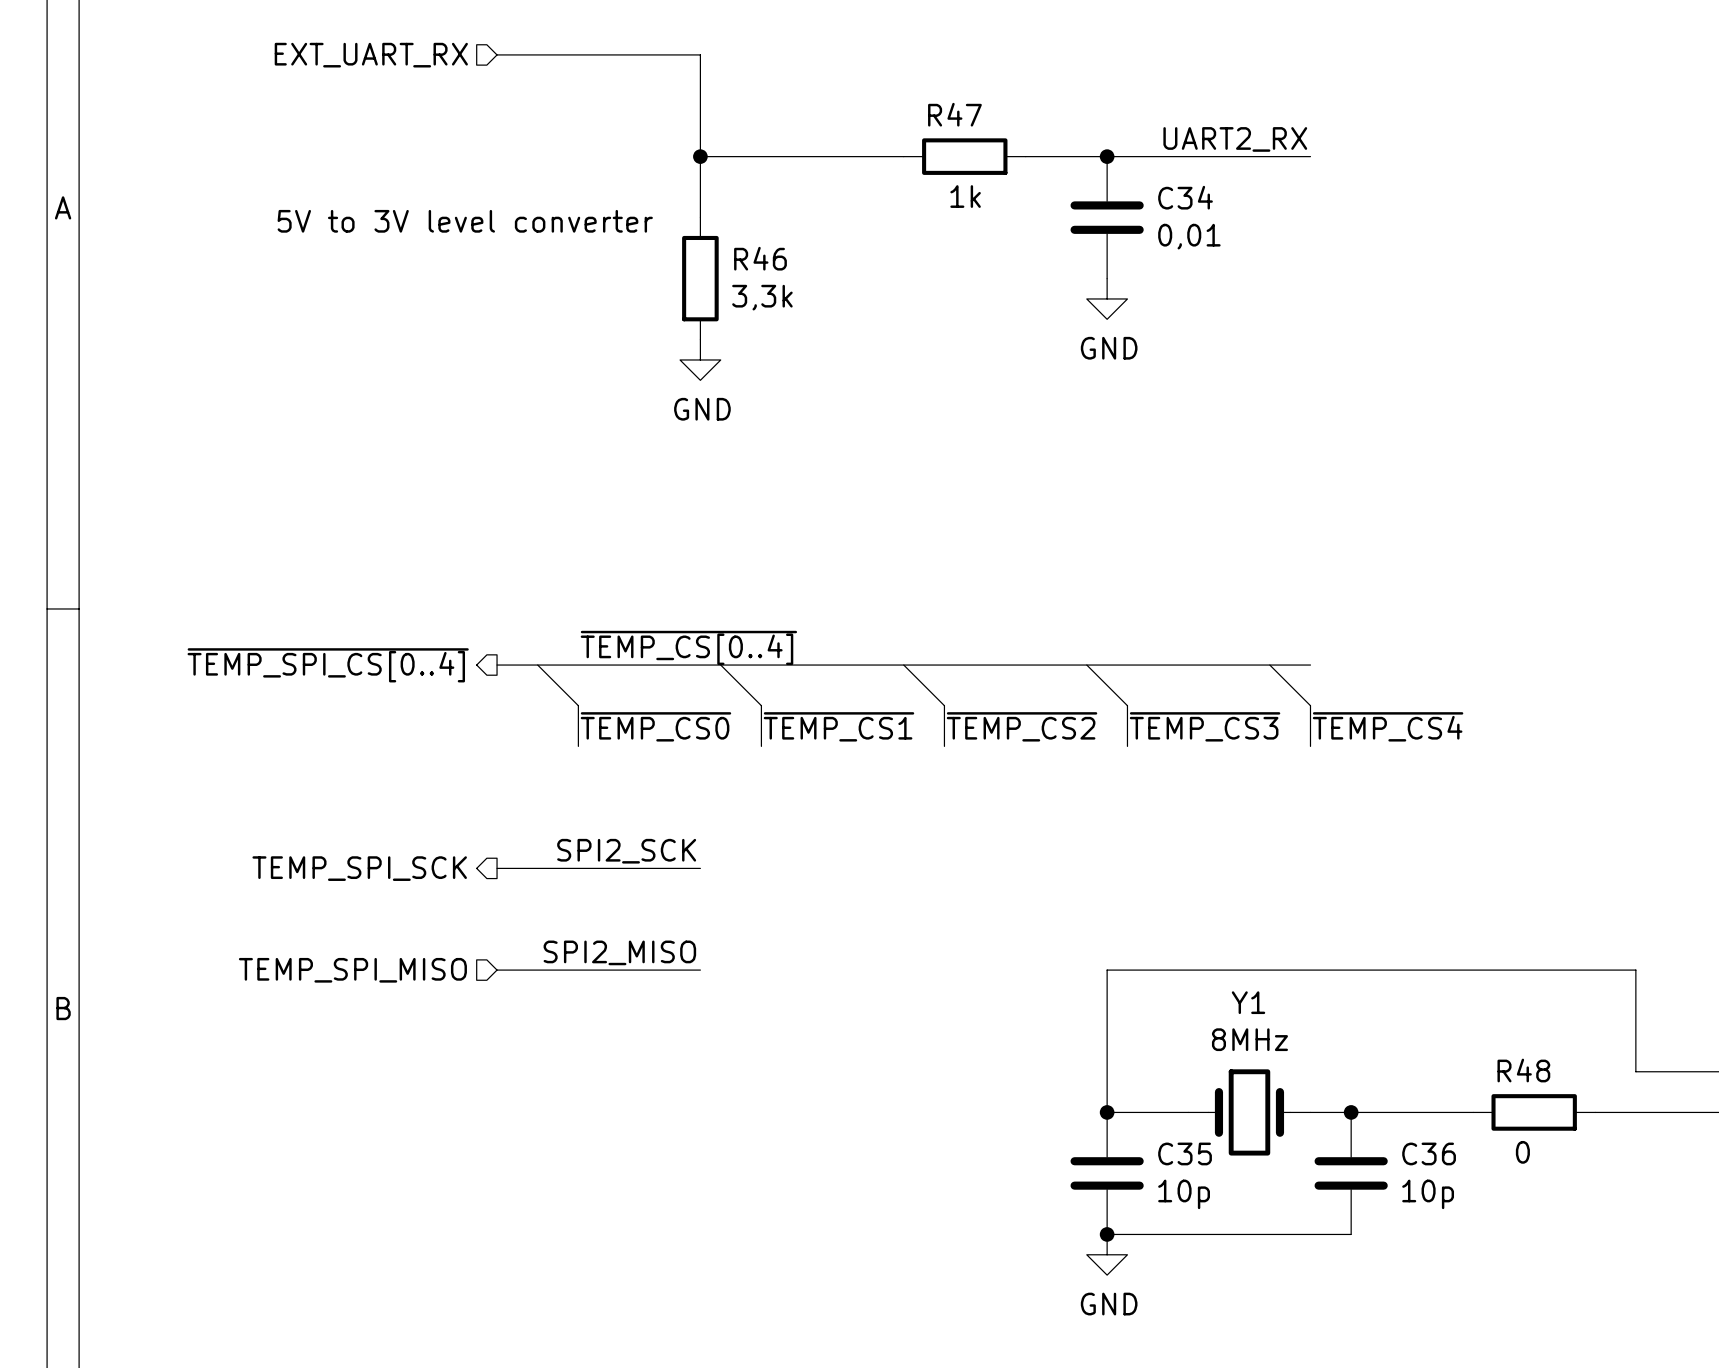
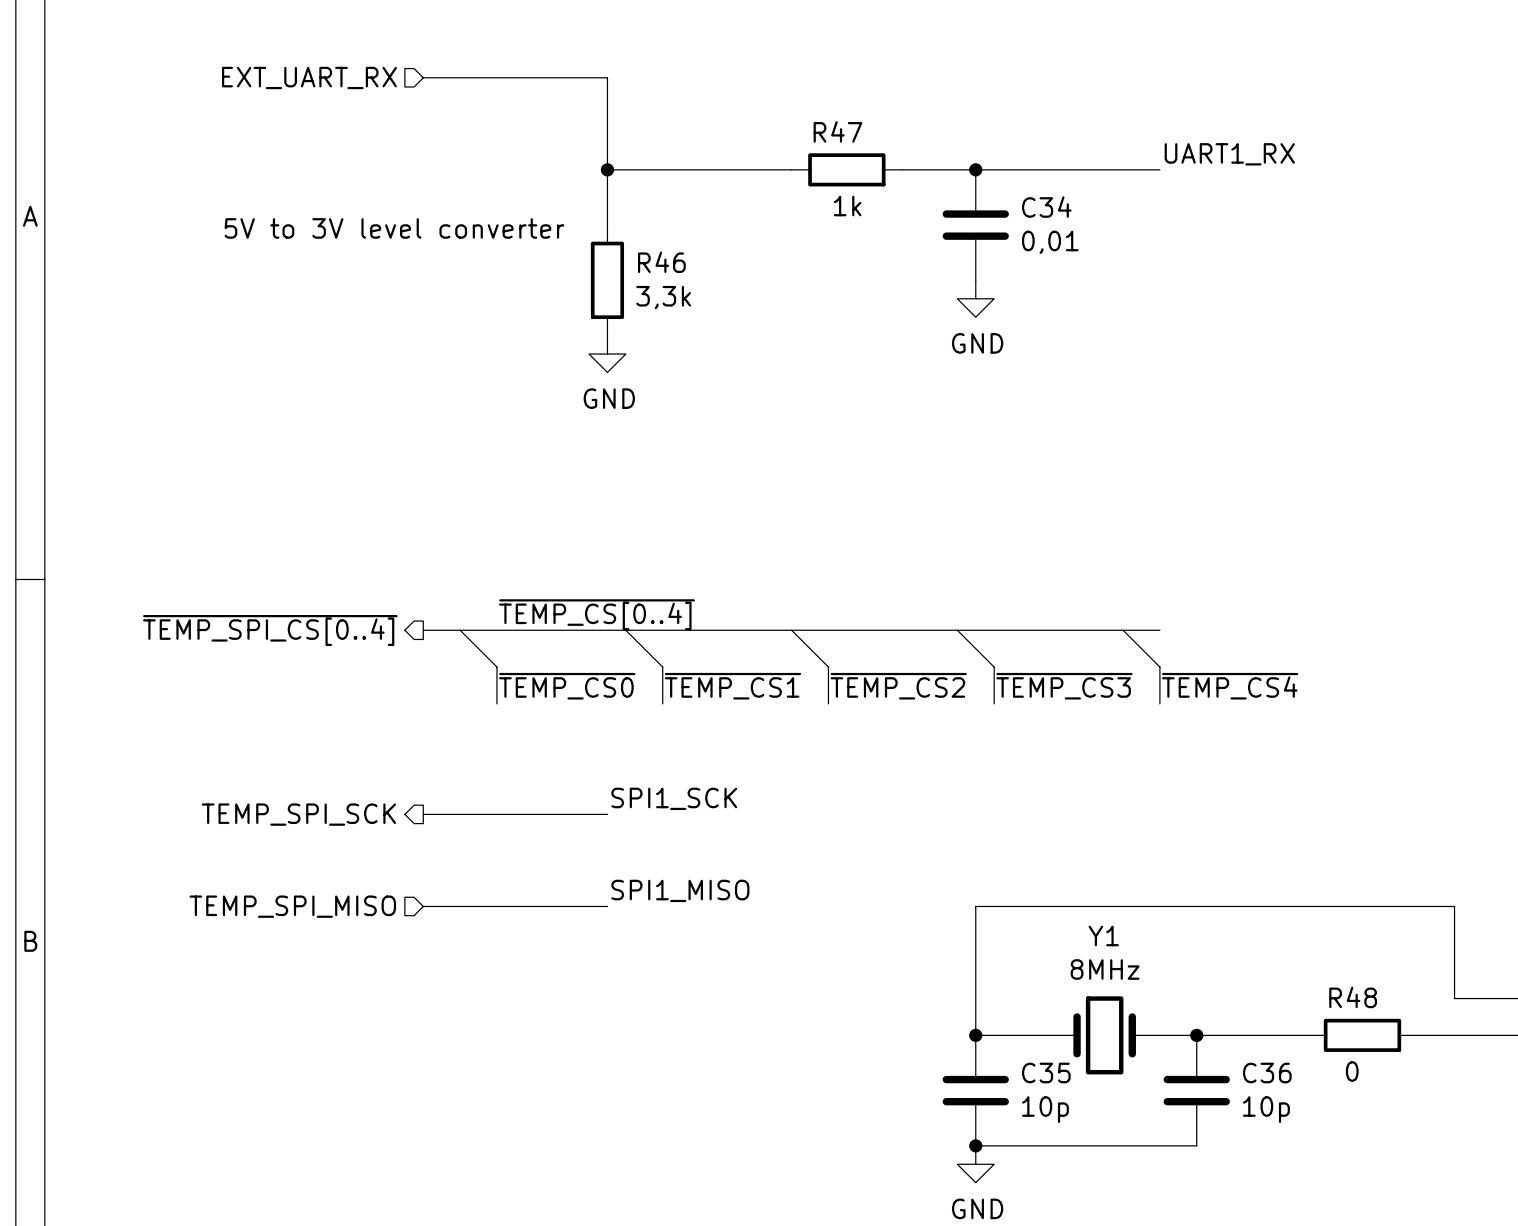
label: UART2_RX (1235, 139) -> UART1_RX (1229, 154)
label: SPI2_SCK (626, 851) -> SPI1_SCK (674, 798)
label: SPI2_MISO (619, 952) -> SPI1_MISO (680, 890)

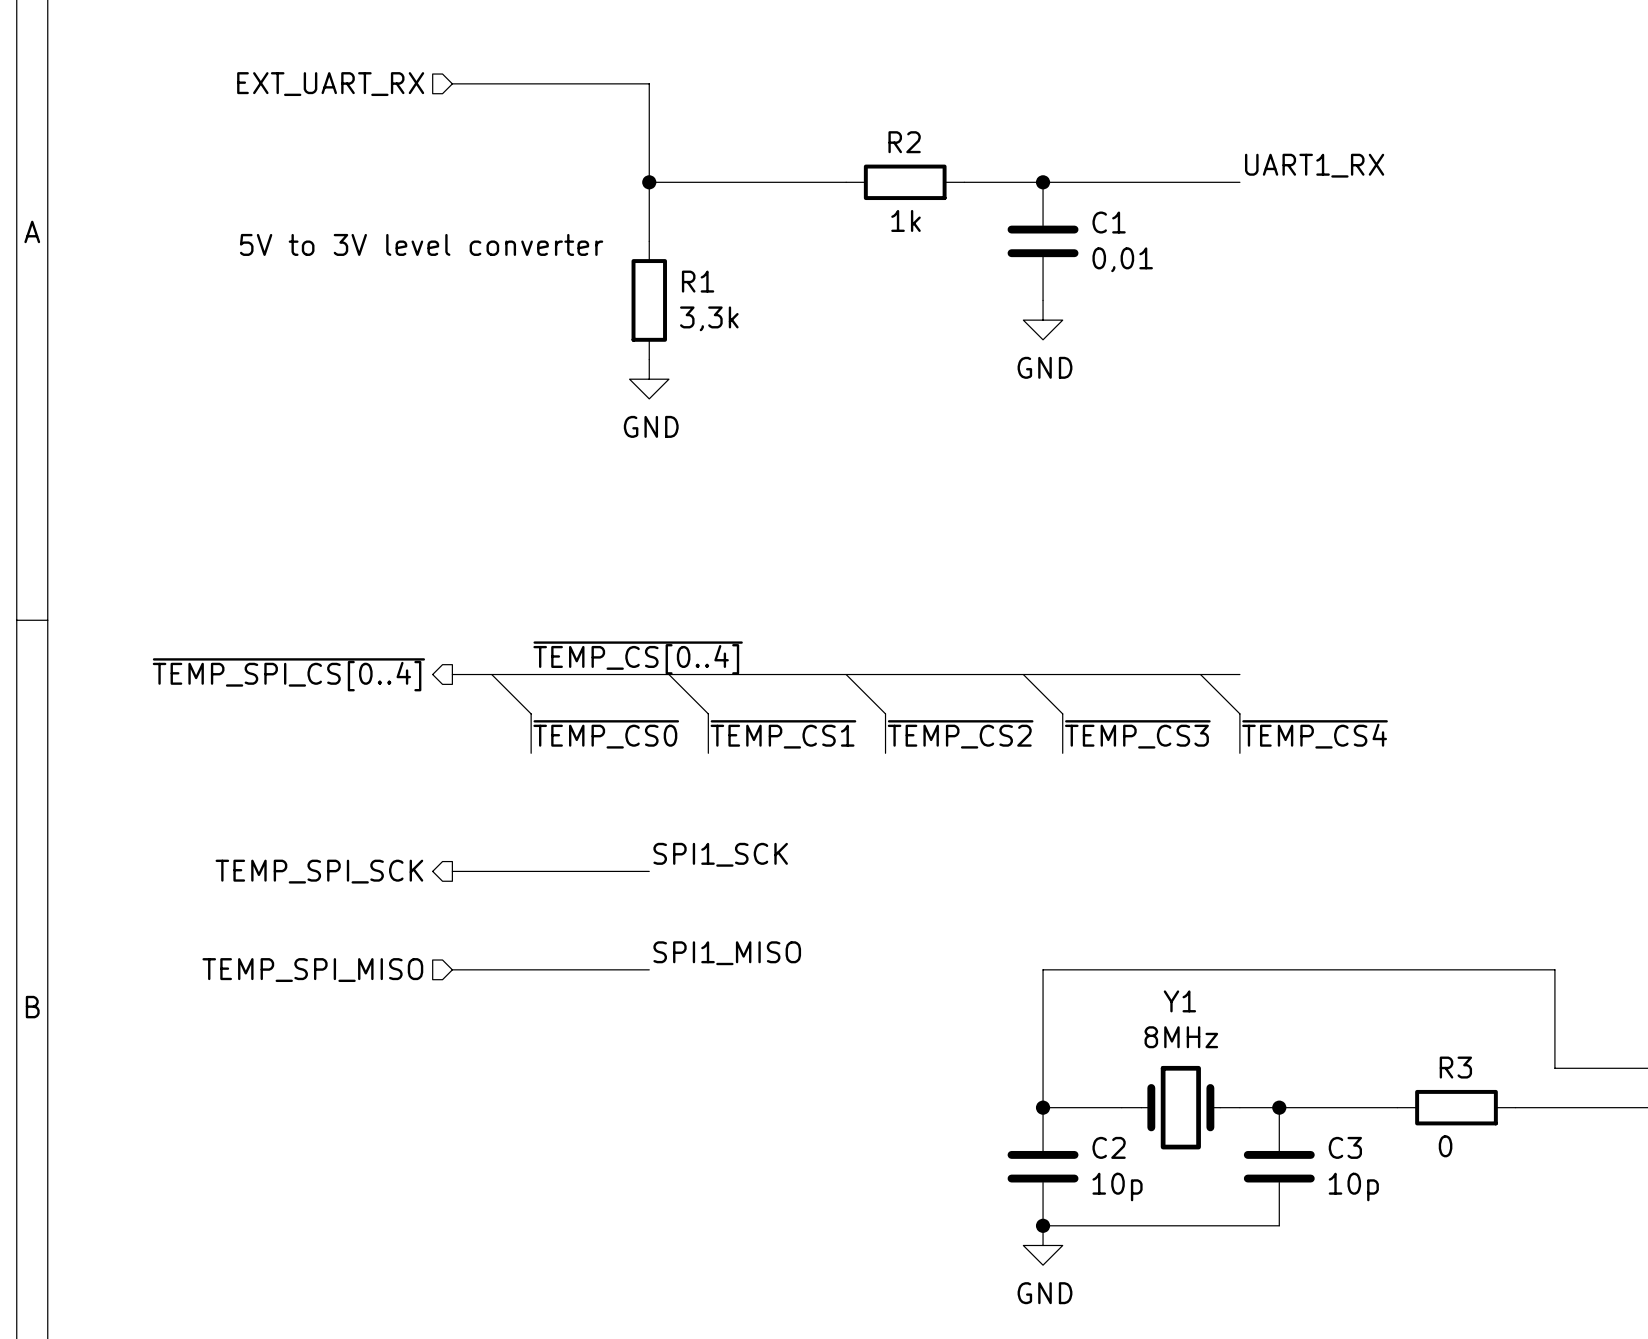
R47 name: R47 (837, 131) -> R2 (904, 142)
C34 name: C34 (1046, 207) -> C1 (1109, 222)
R46 name: R46 (661, 262) -> R1 (698, 281)
R48 name: R48 (1353, 997) -> R3 (1455, 1067)
C35 name: C35 (1046, 1072) -> C2 (1109, 1147)
C36 name: C36 (1267, 1072) -> C3 (1345, 1147)

